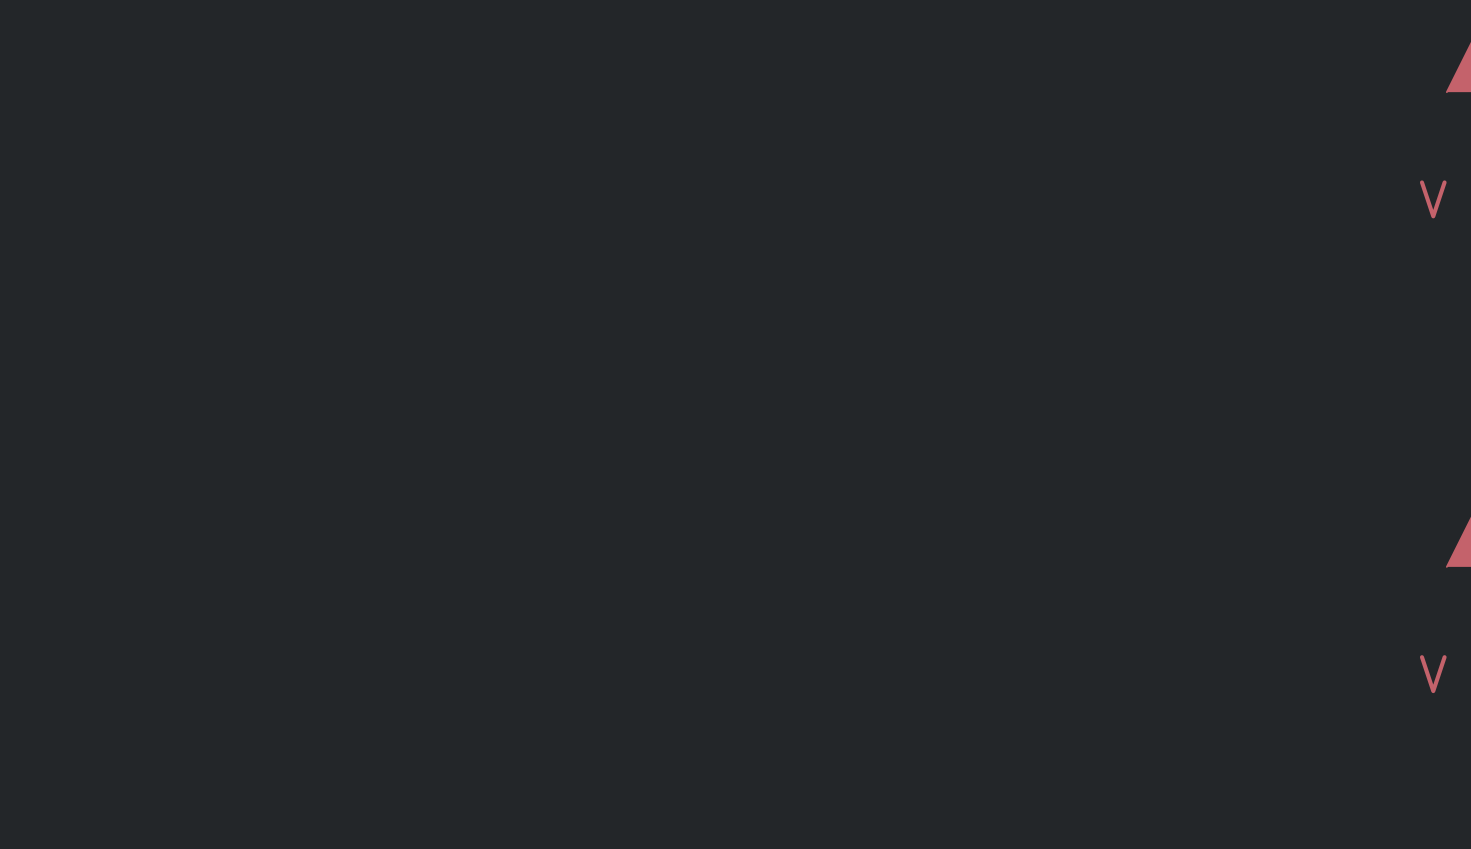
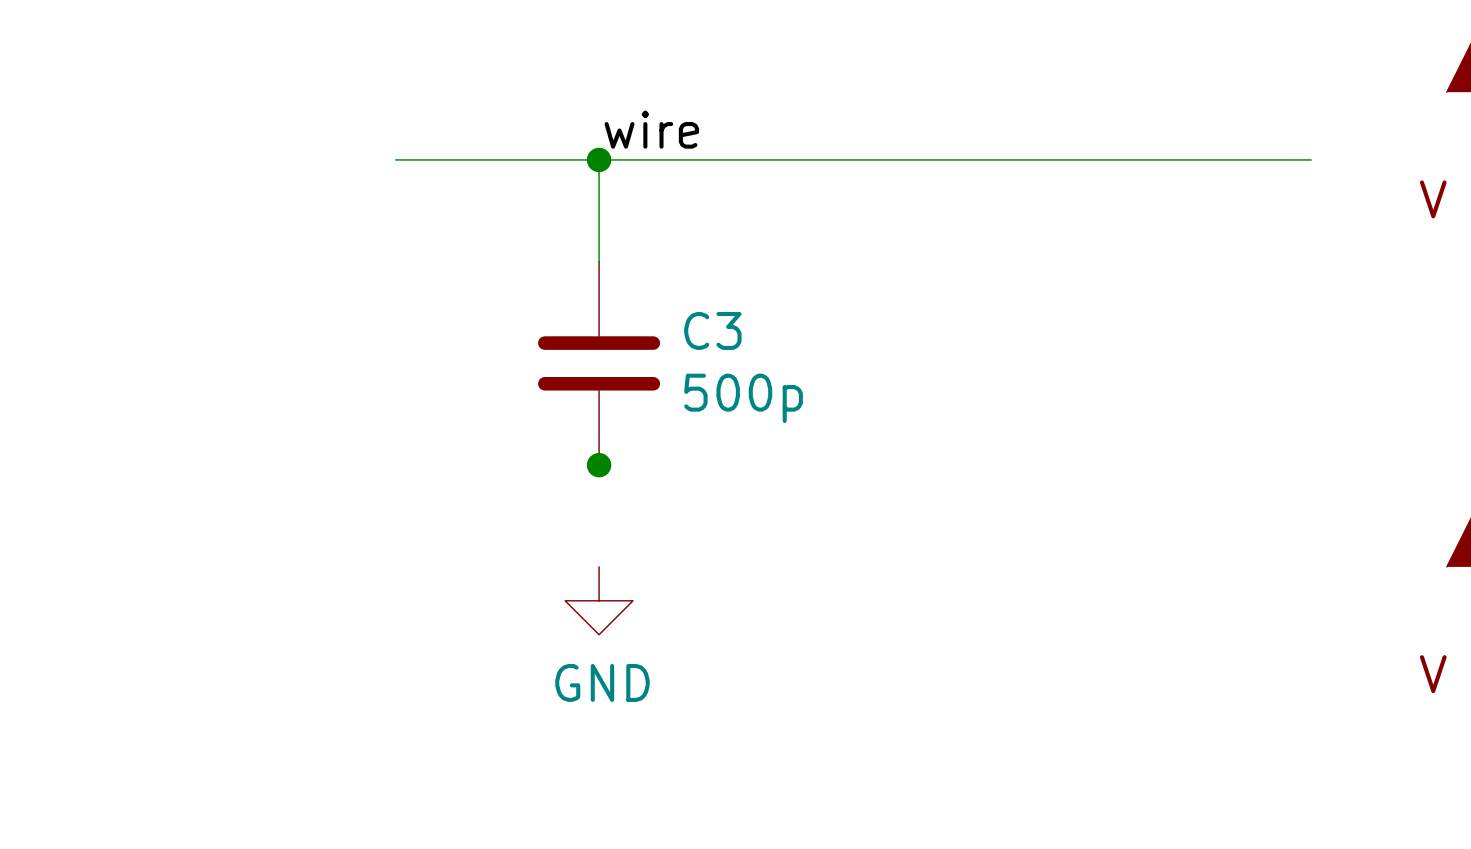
label: none -> wire (651, 129)
wire: none -> (395, 159) (1311, 159)
wire: none -> (599, 159) (599, 261)
junction: none -> (599, 159)
C3: none -> 500p (599, 363)
junction: none -> (599, 465)
power symbol: none -> GND (599, 600)

